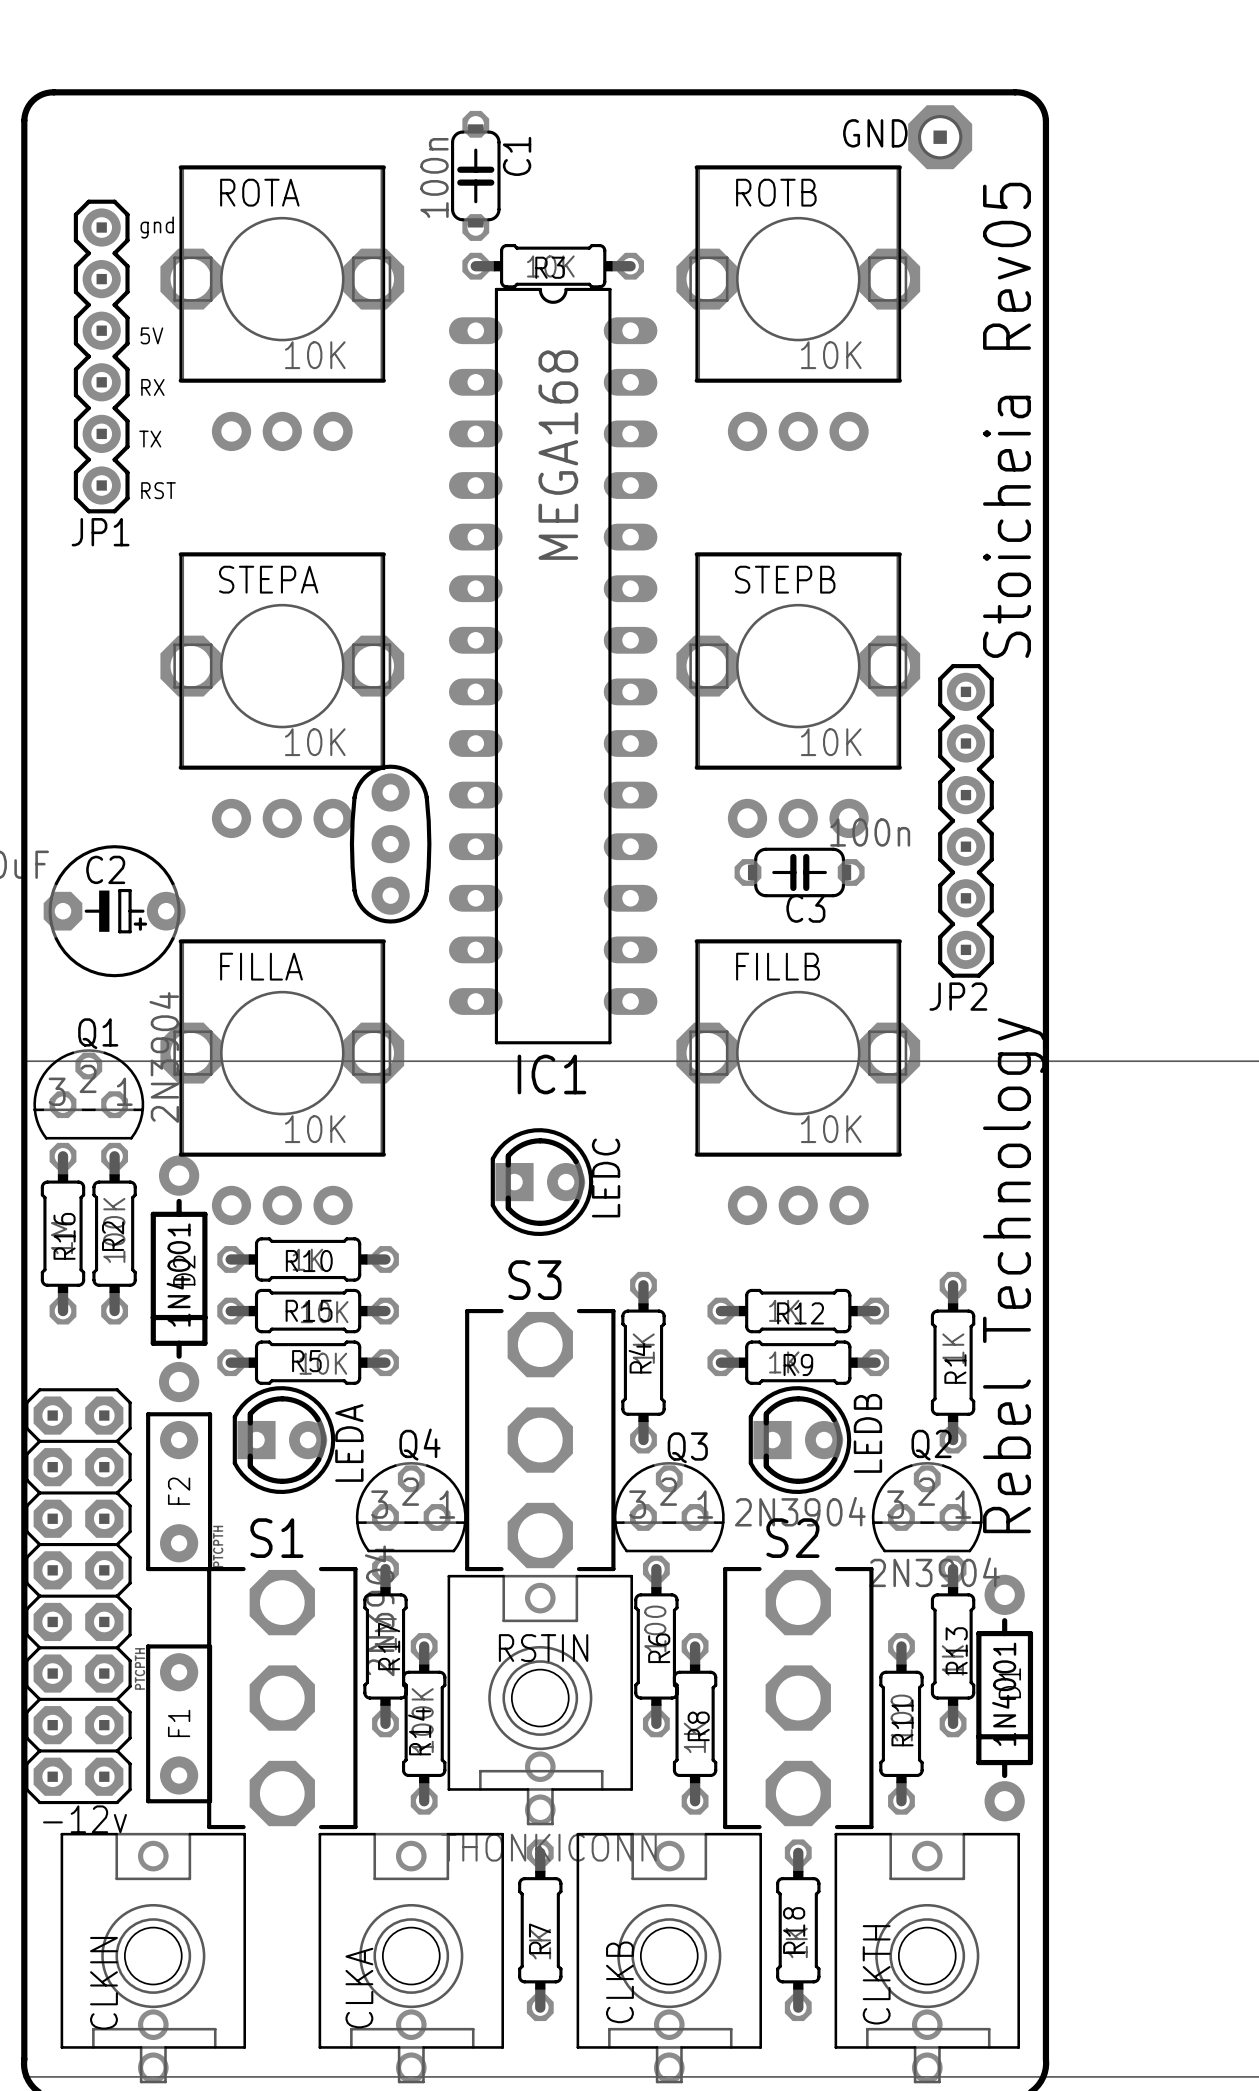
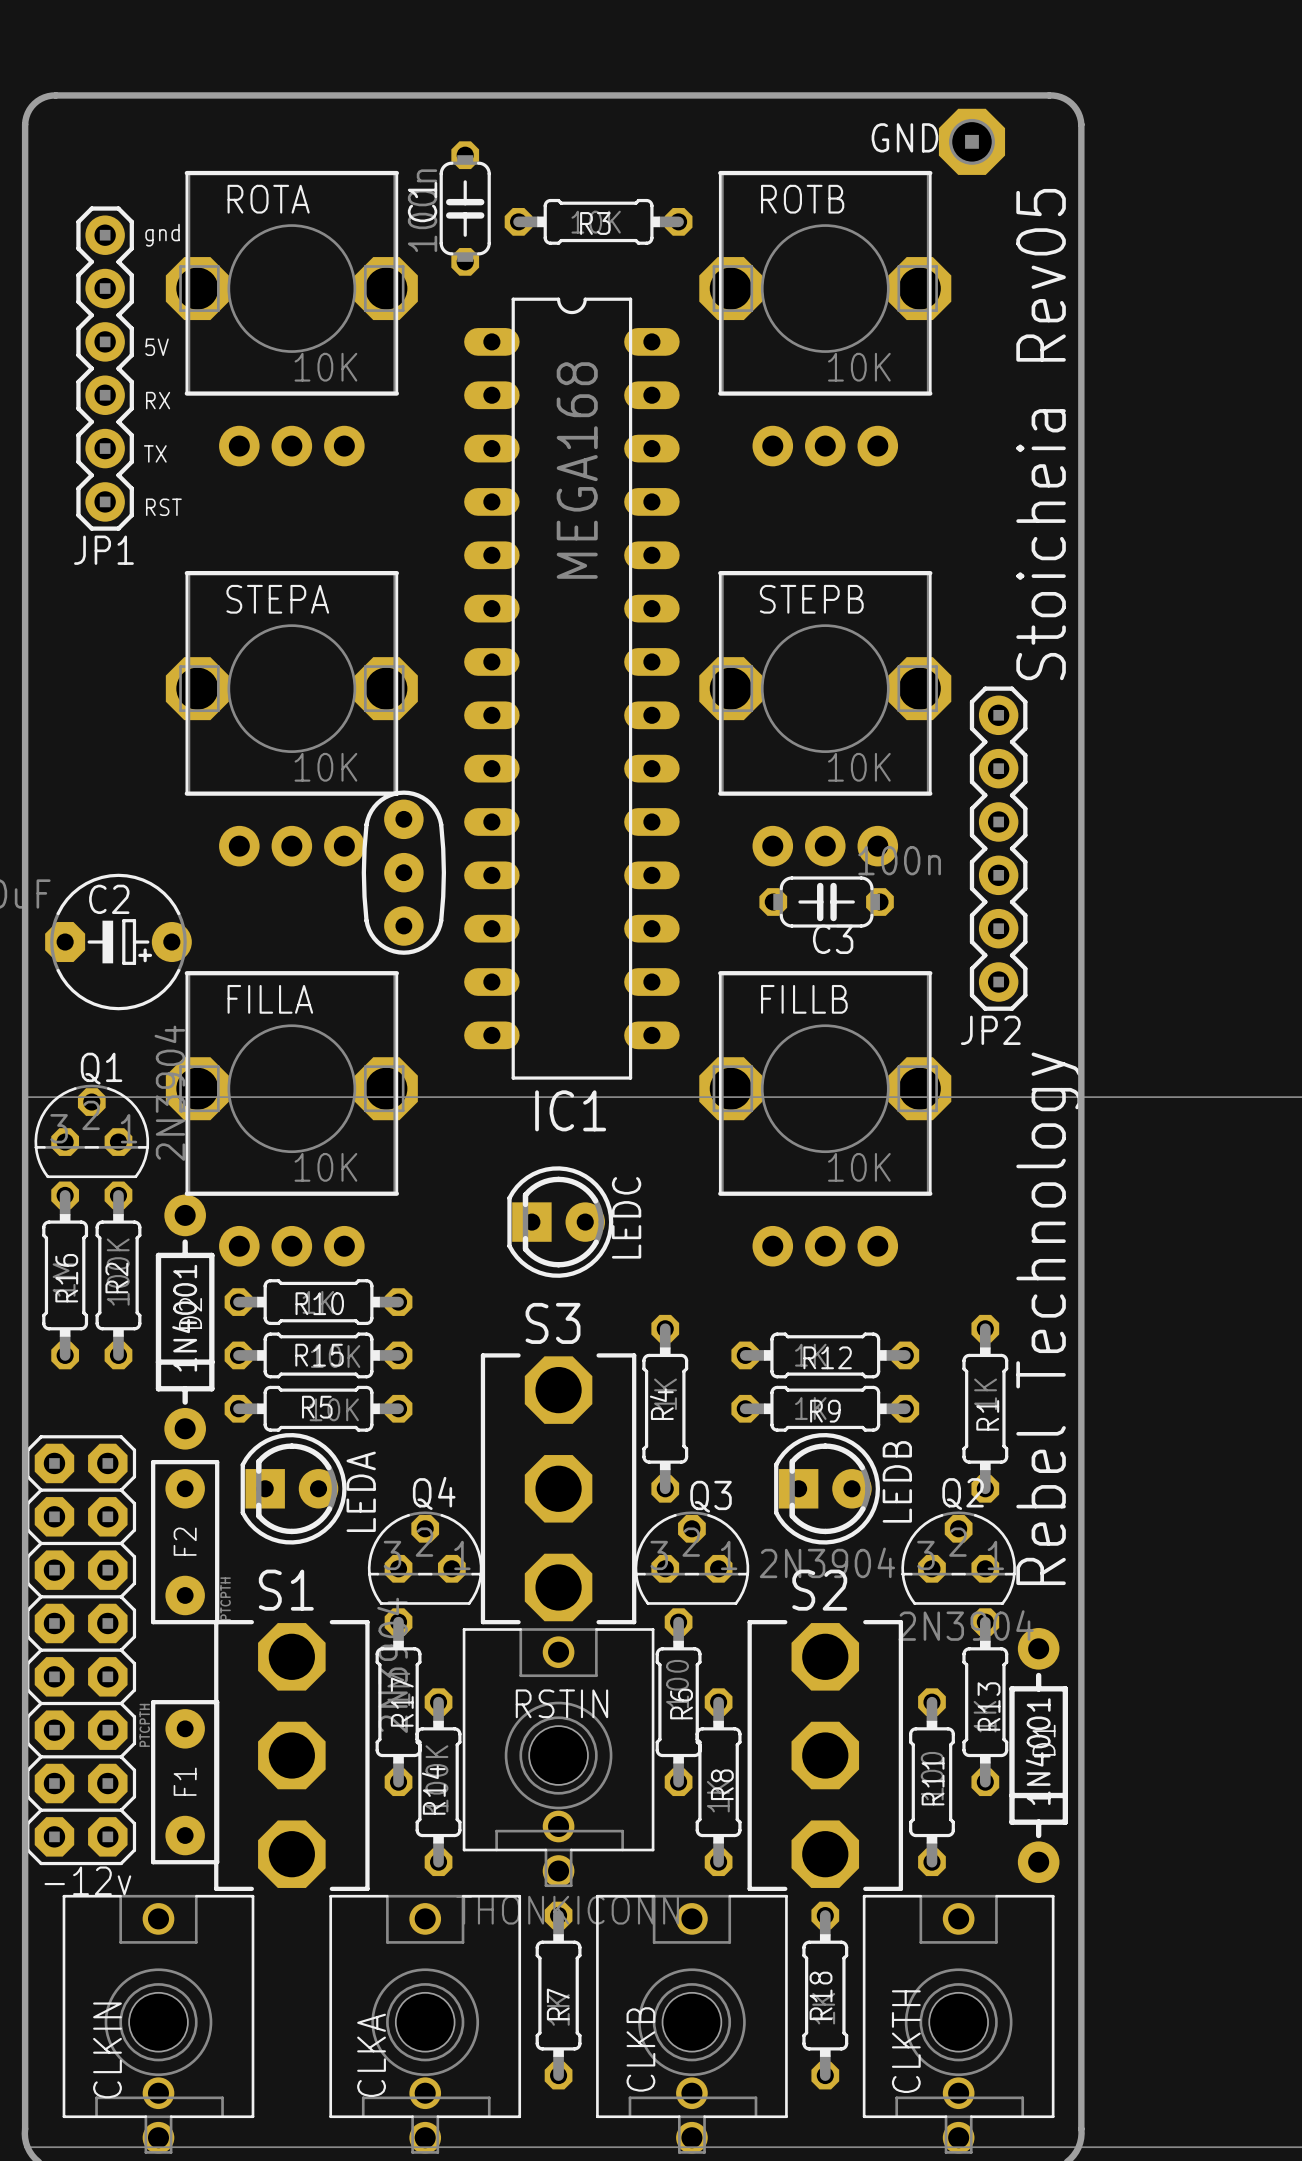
C1 name position: C1 (517, 156) -> C1 (422, 202)
C1 position: (475, 175) -> (465, 208)
R3 position: (553, 266) -> (598, 221)

